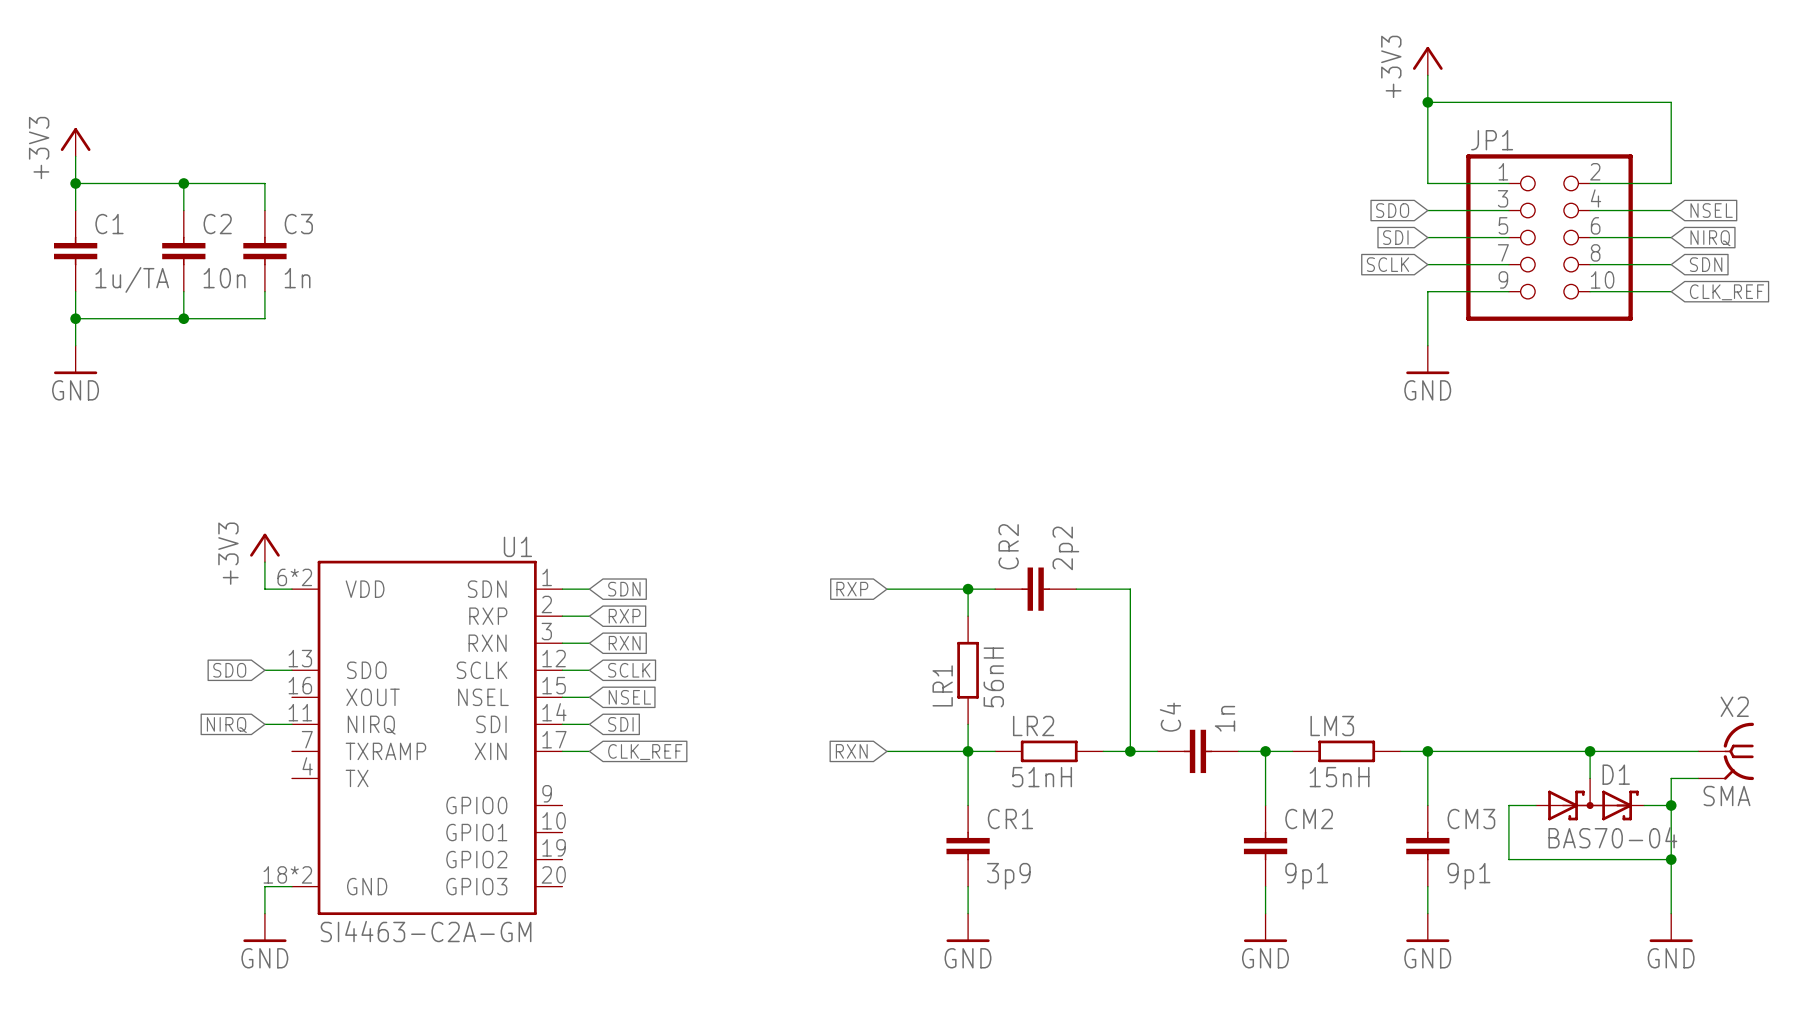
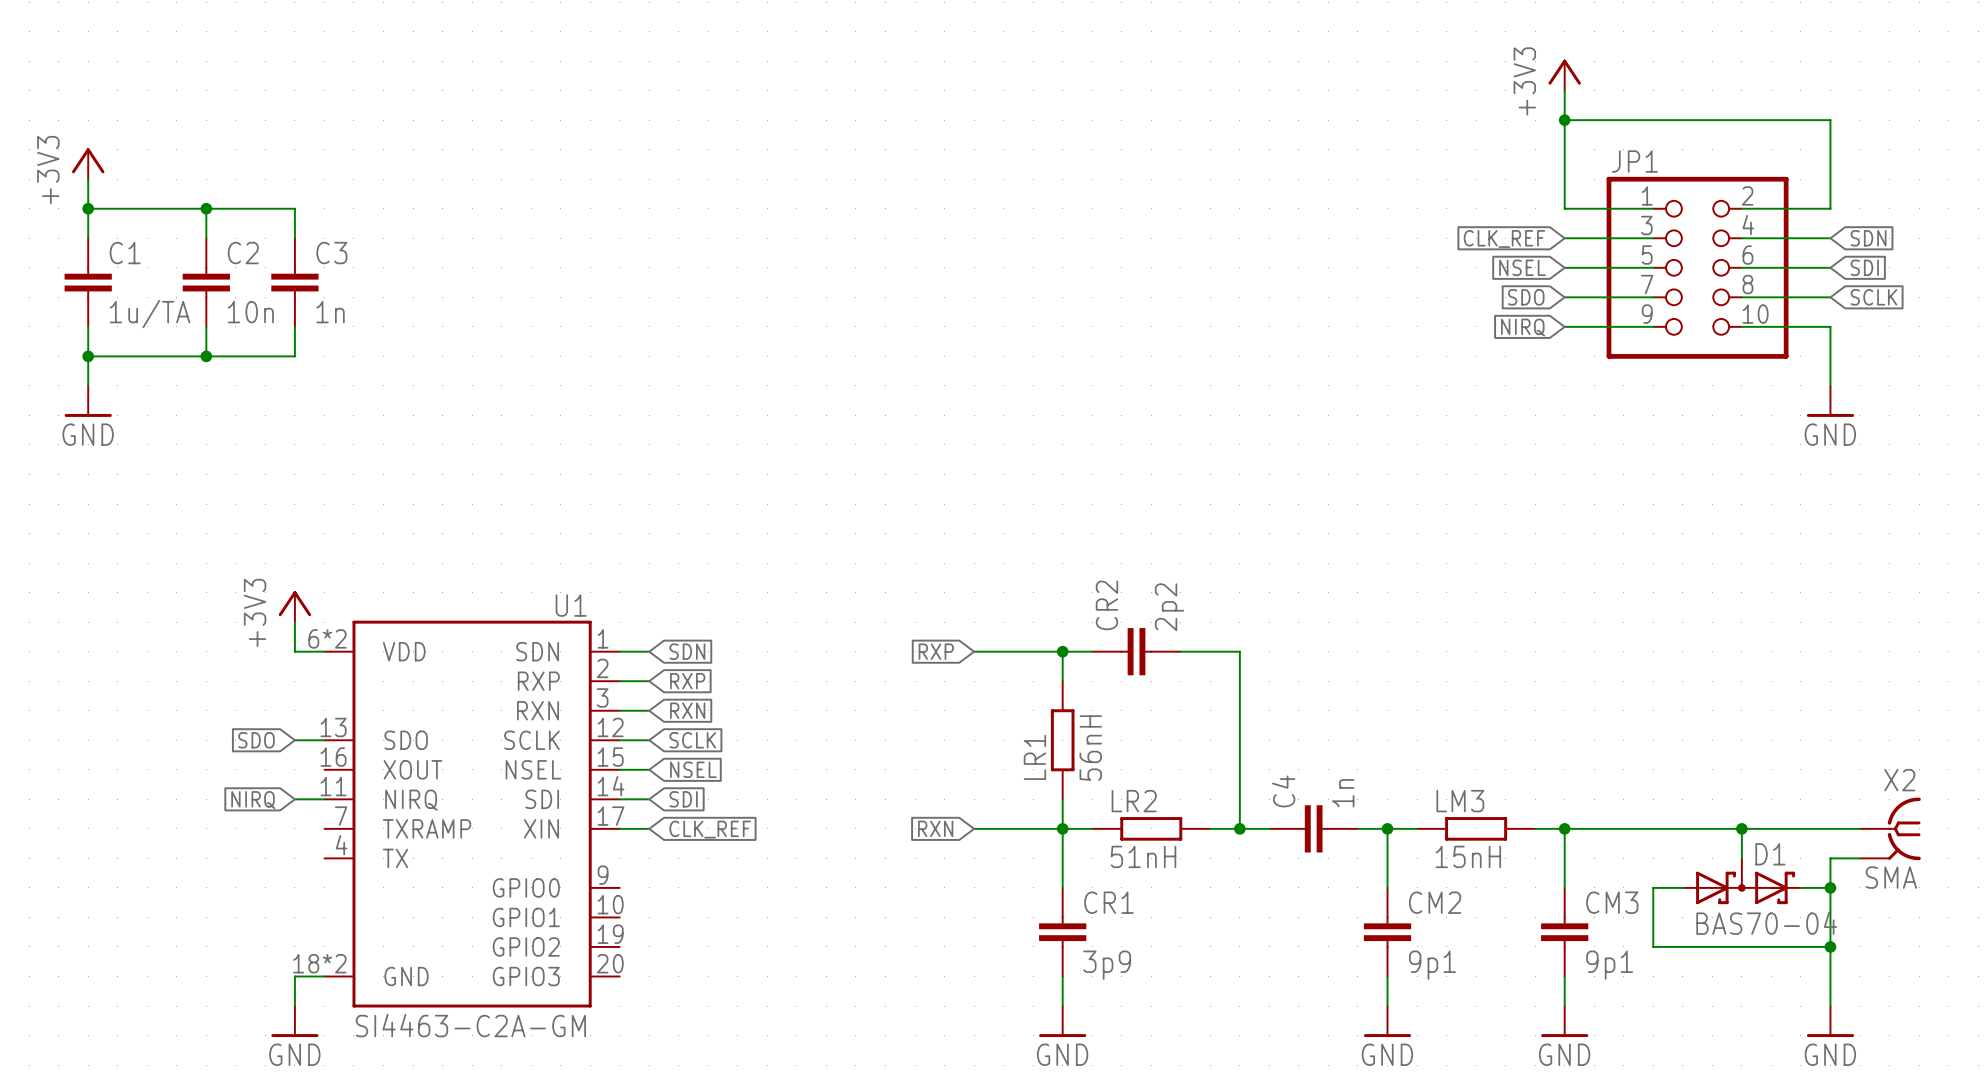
global label: SDO (1392, 210) -> CLK_REF (1504, 238)
global label: NSEL (1711, 210) -> SDN (1868, 238)
global label: SDI (1395, 237) -> NSEL (1522, 267)
global label: NIRQ (1710, 238) -> SDI (1864, 267)
global label: SCLK (1387, 264) -> SDO (1526, 297)
global label: SDN (1706, 264) -> SCLK (1873, 297)
wire: (1427, 291) (1427, 345) -> (1830, 326) (1830, 385)
global label: none -> NIRQ (1523, 327)
global label: CLK_REF (1726, 292) -> none
power symbol position: GND (1427, 359) -> GND (1830, 401)

